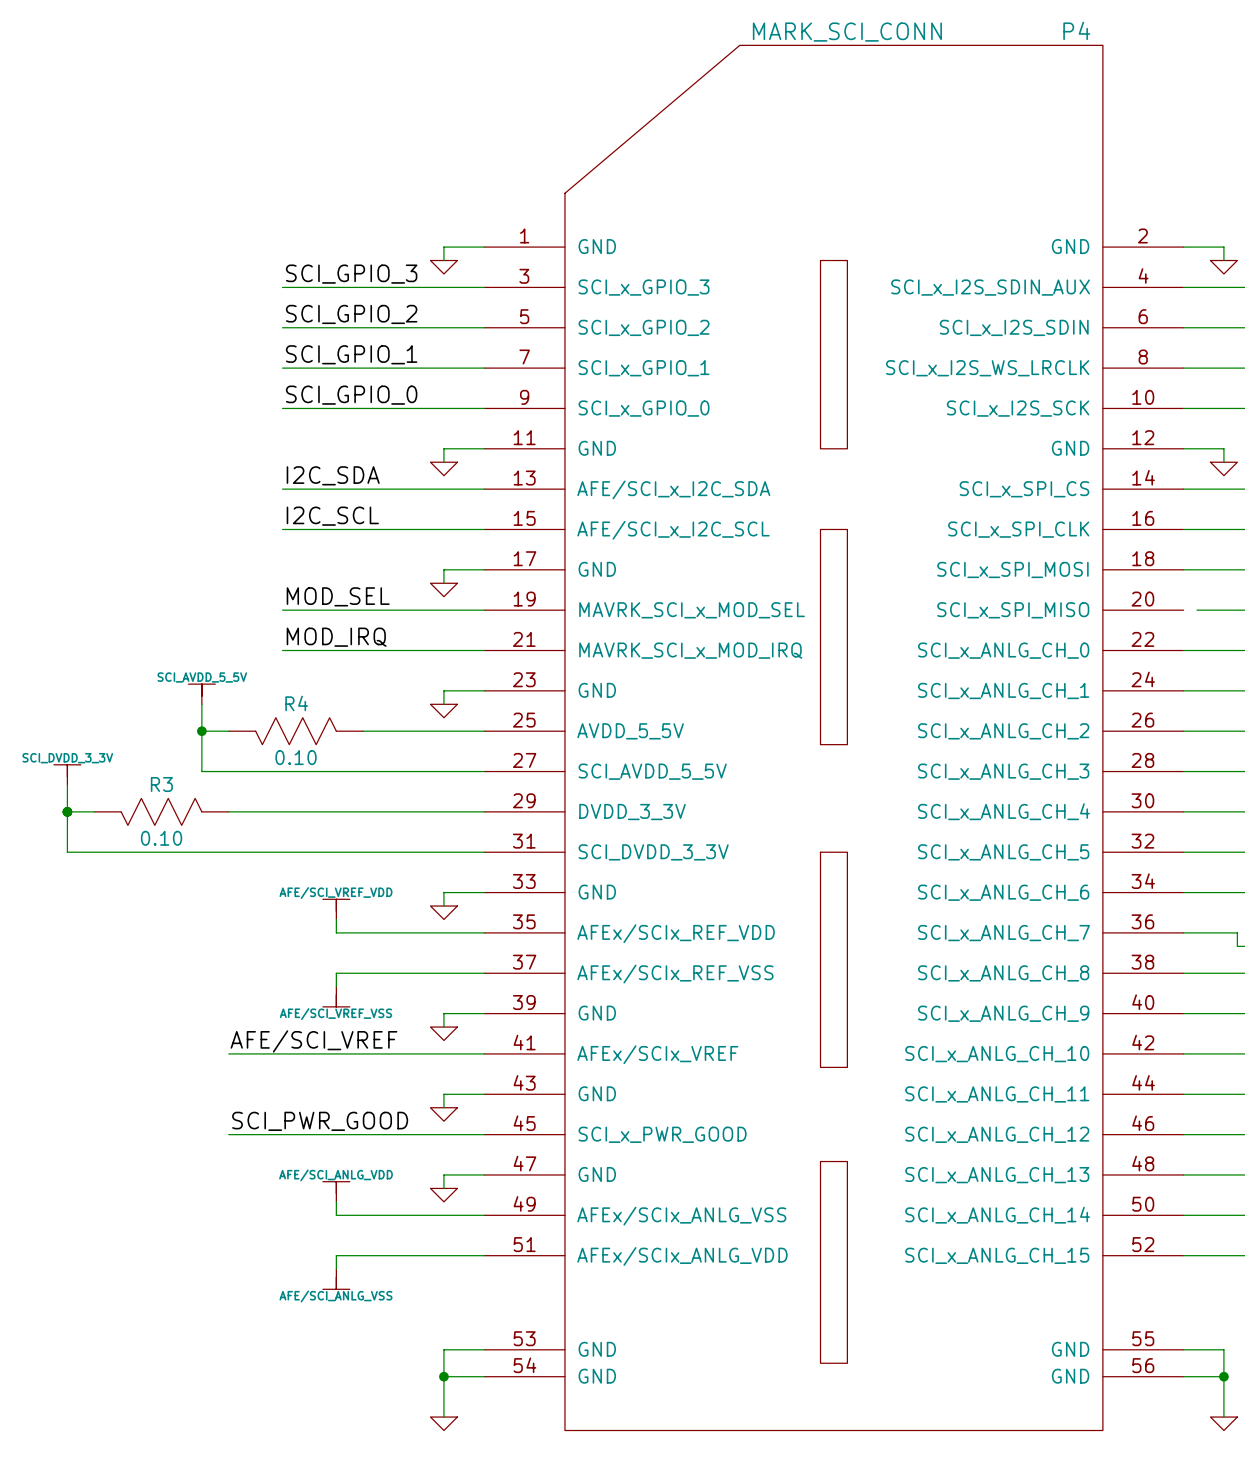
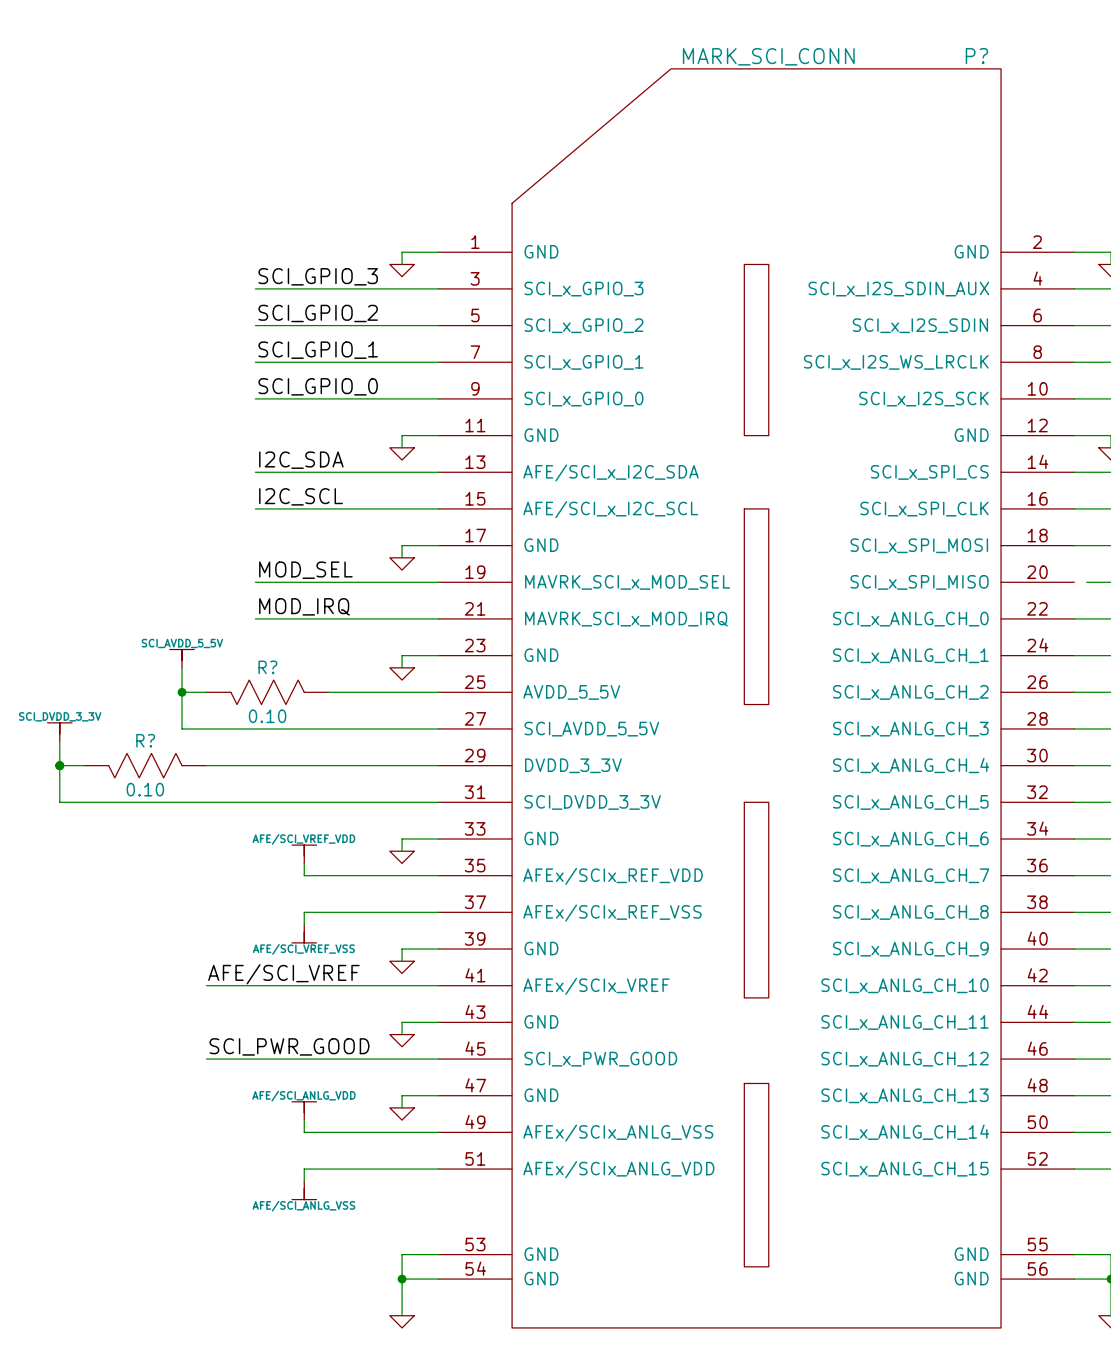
P4 name: P4 (1076, 30) -> P? (976, 56)
R4 name: R4 (296, 703) -> R? (267, 667)
R3 name: R3 (161, 784) -> R? (145, 740)

